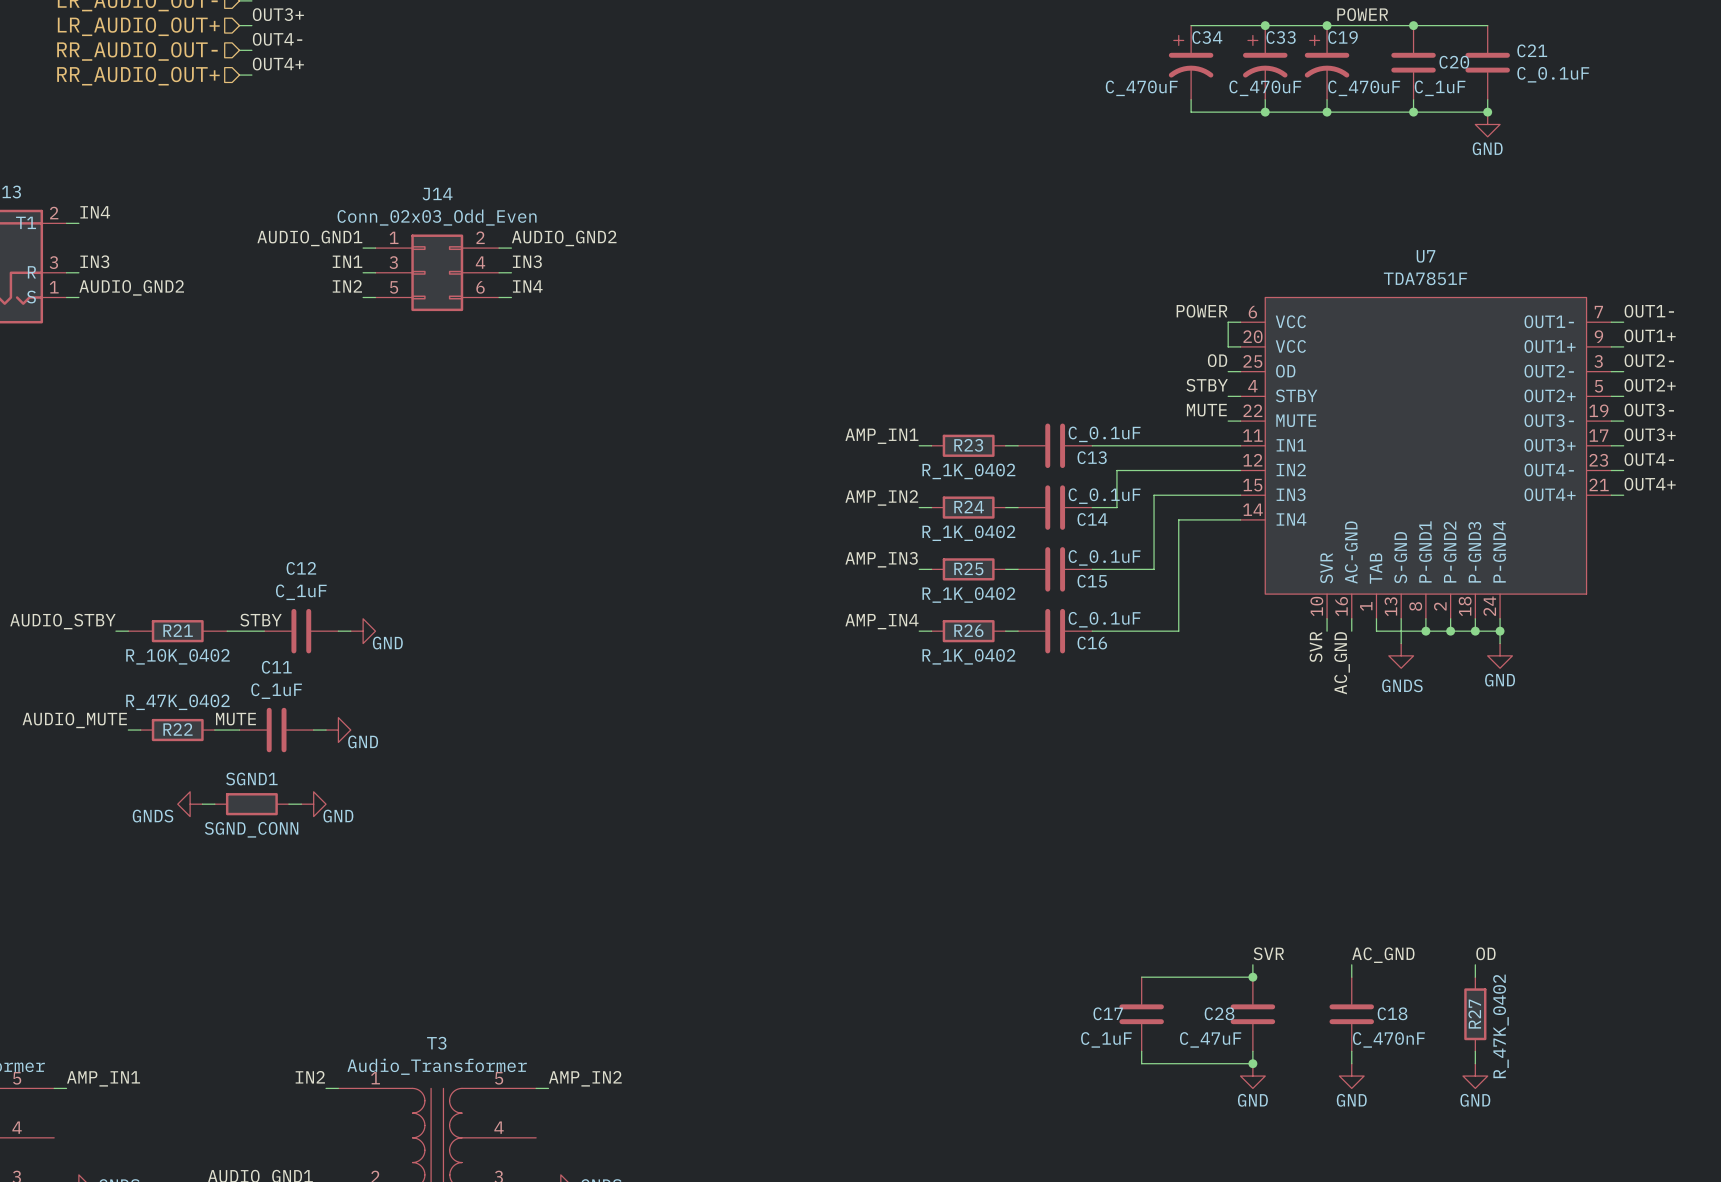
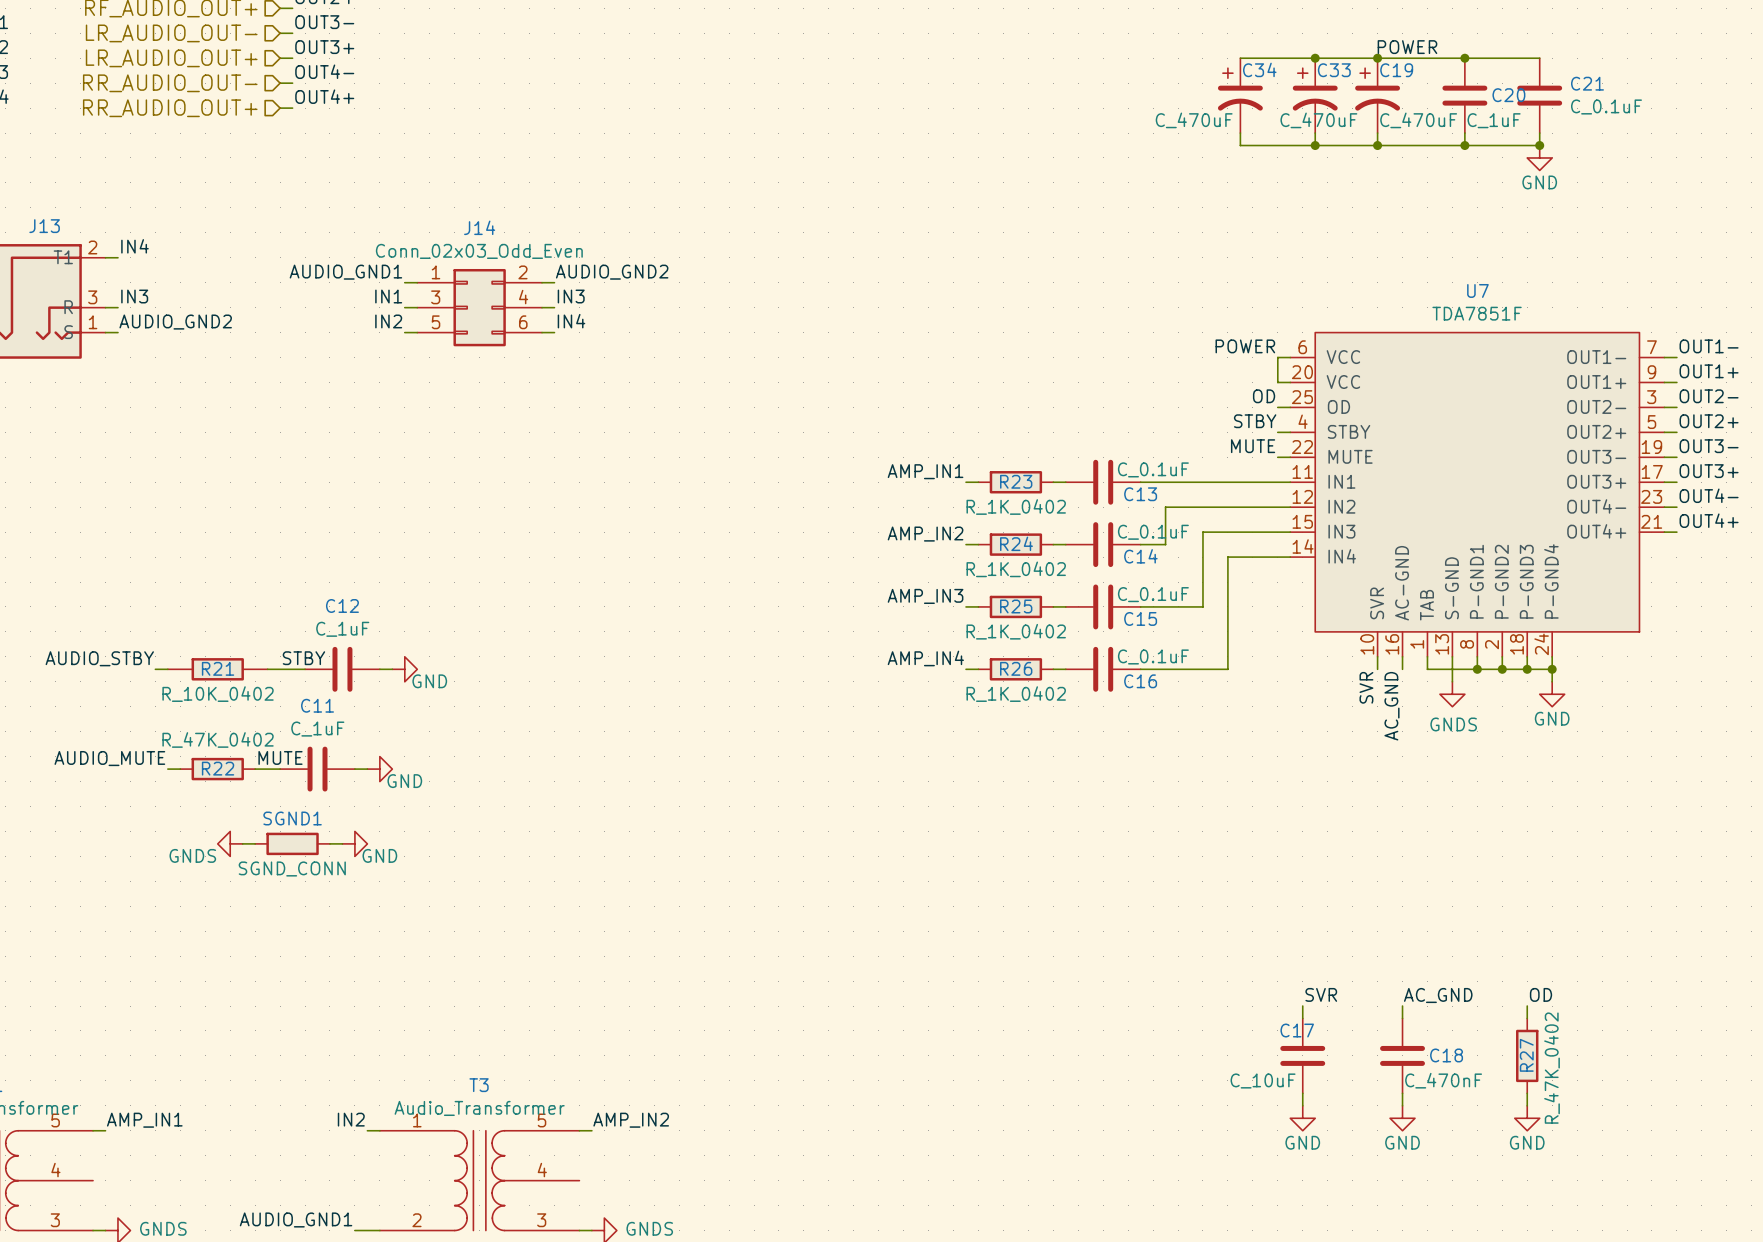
wire: (1141, 977) (1252, 977) -> none
junction: (1252, 977) -> none
C28 name: C28 (1219, 1013) -> C17 (1297, 1030)
C17: C_1uF (1141, 1014) -> none
C28 value: C_47uF (1210, 1039) -> C_10uF (1263, 1081)
wire: (1141, 1051) (1141, 1063) (1252, 1063) -> none
junction: (1252, 1063) -> none

